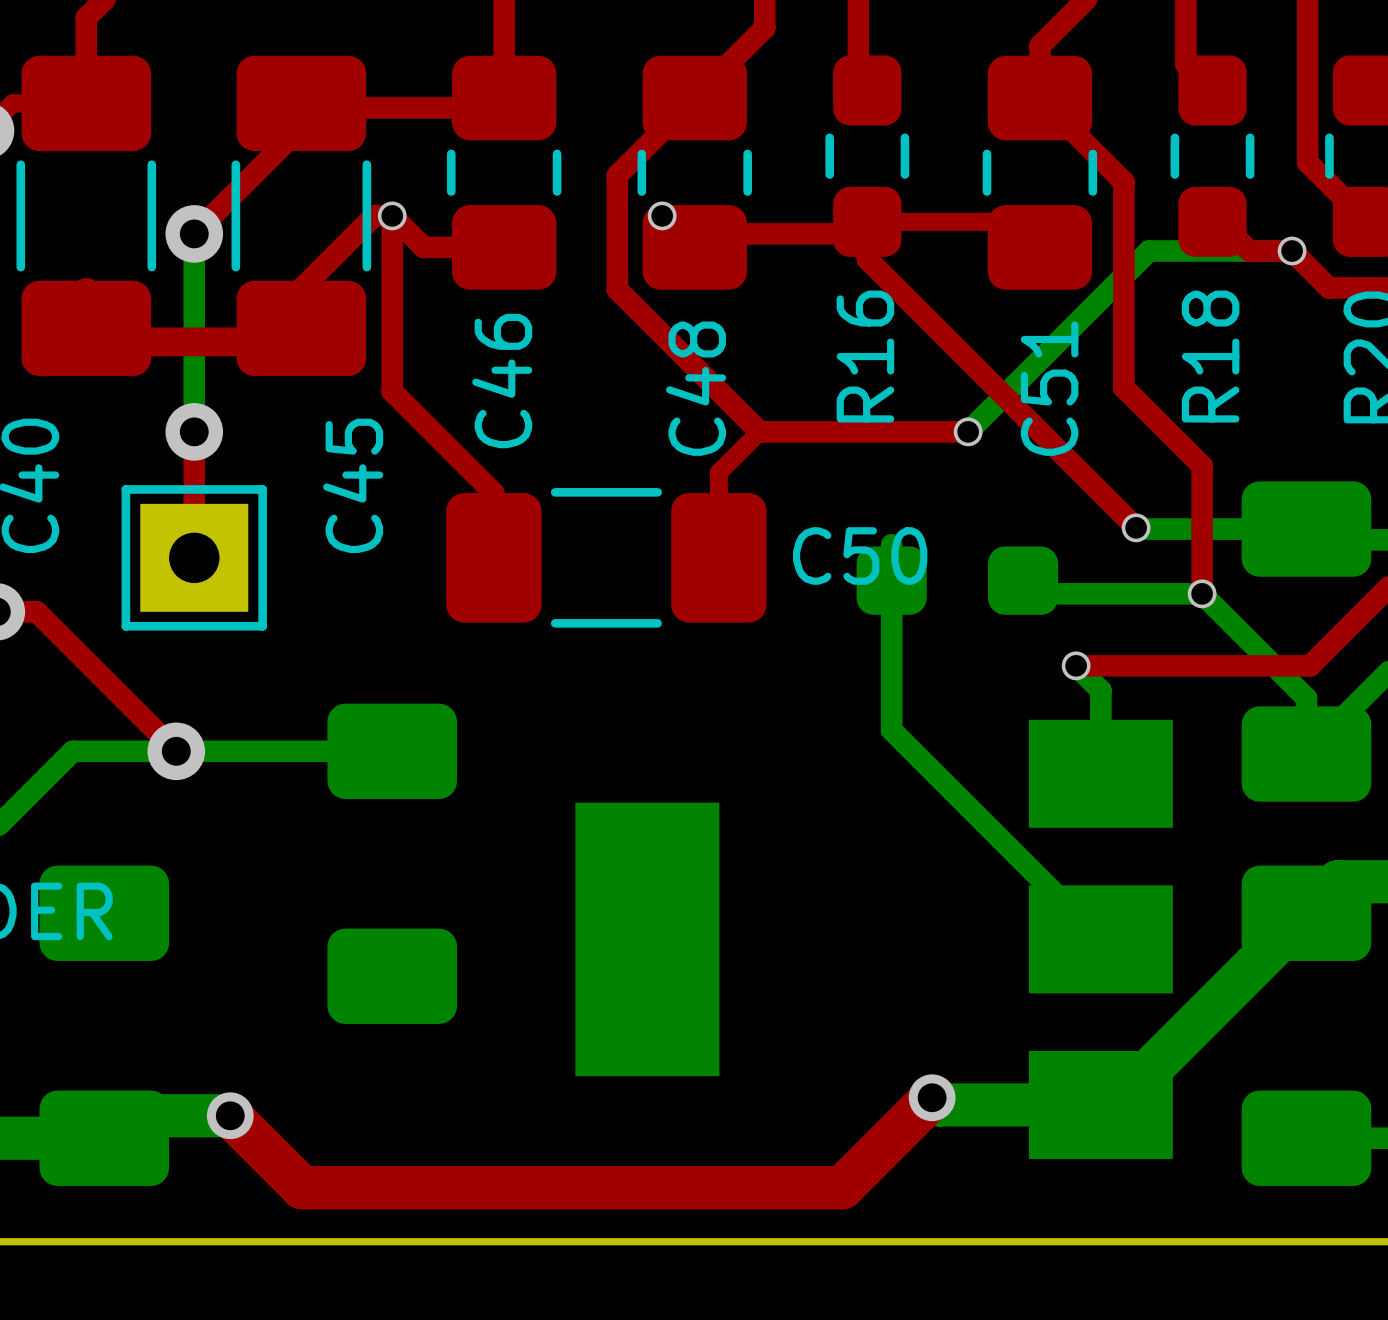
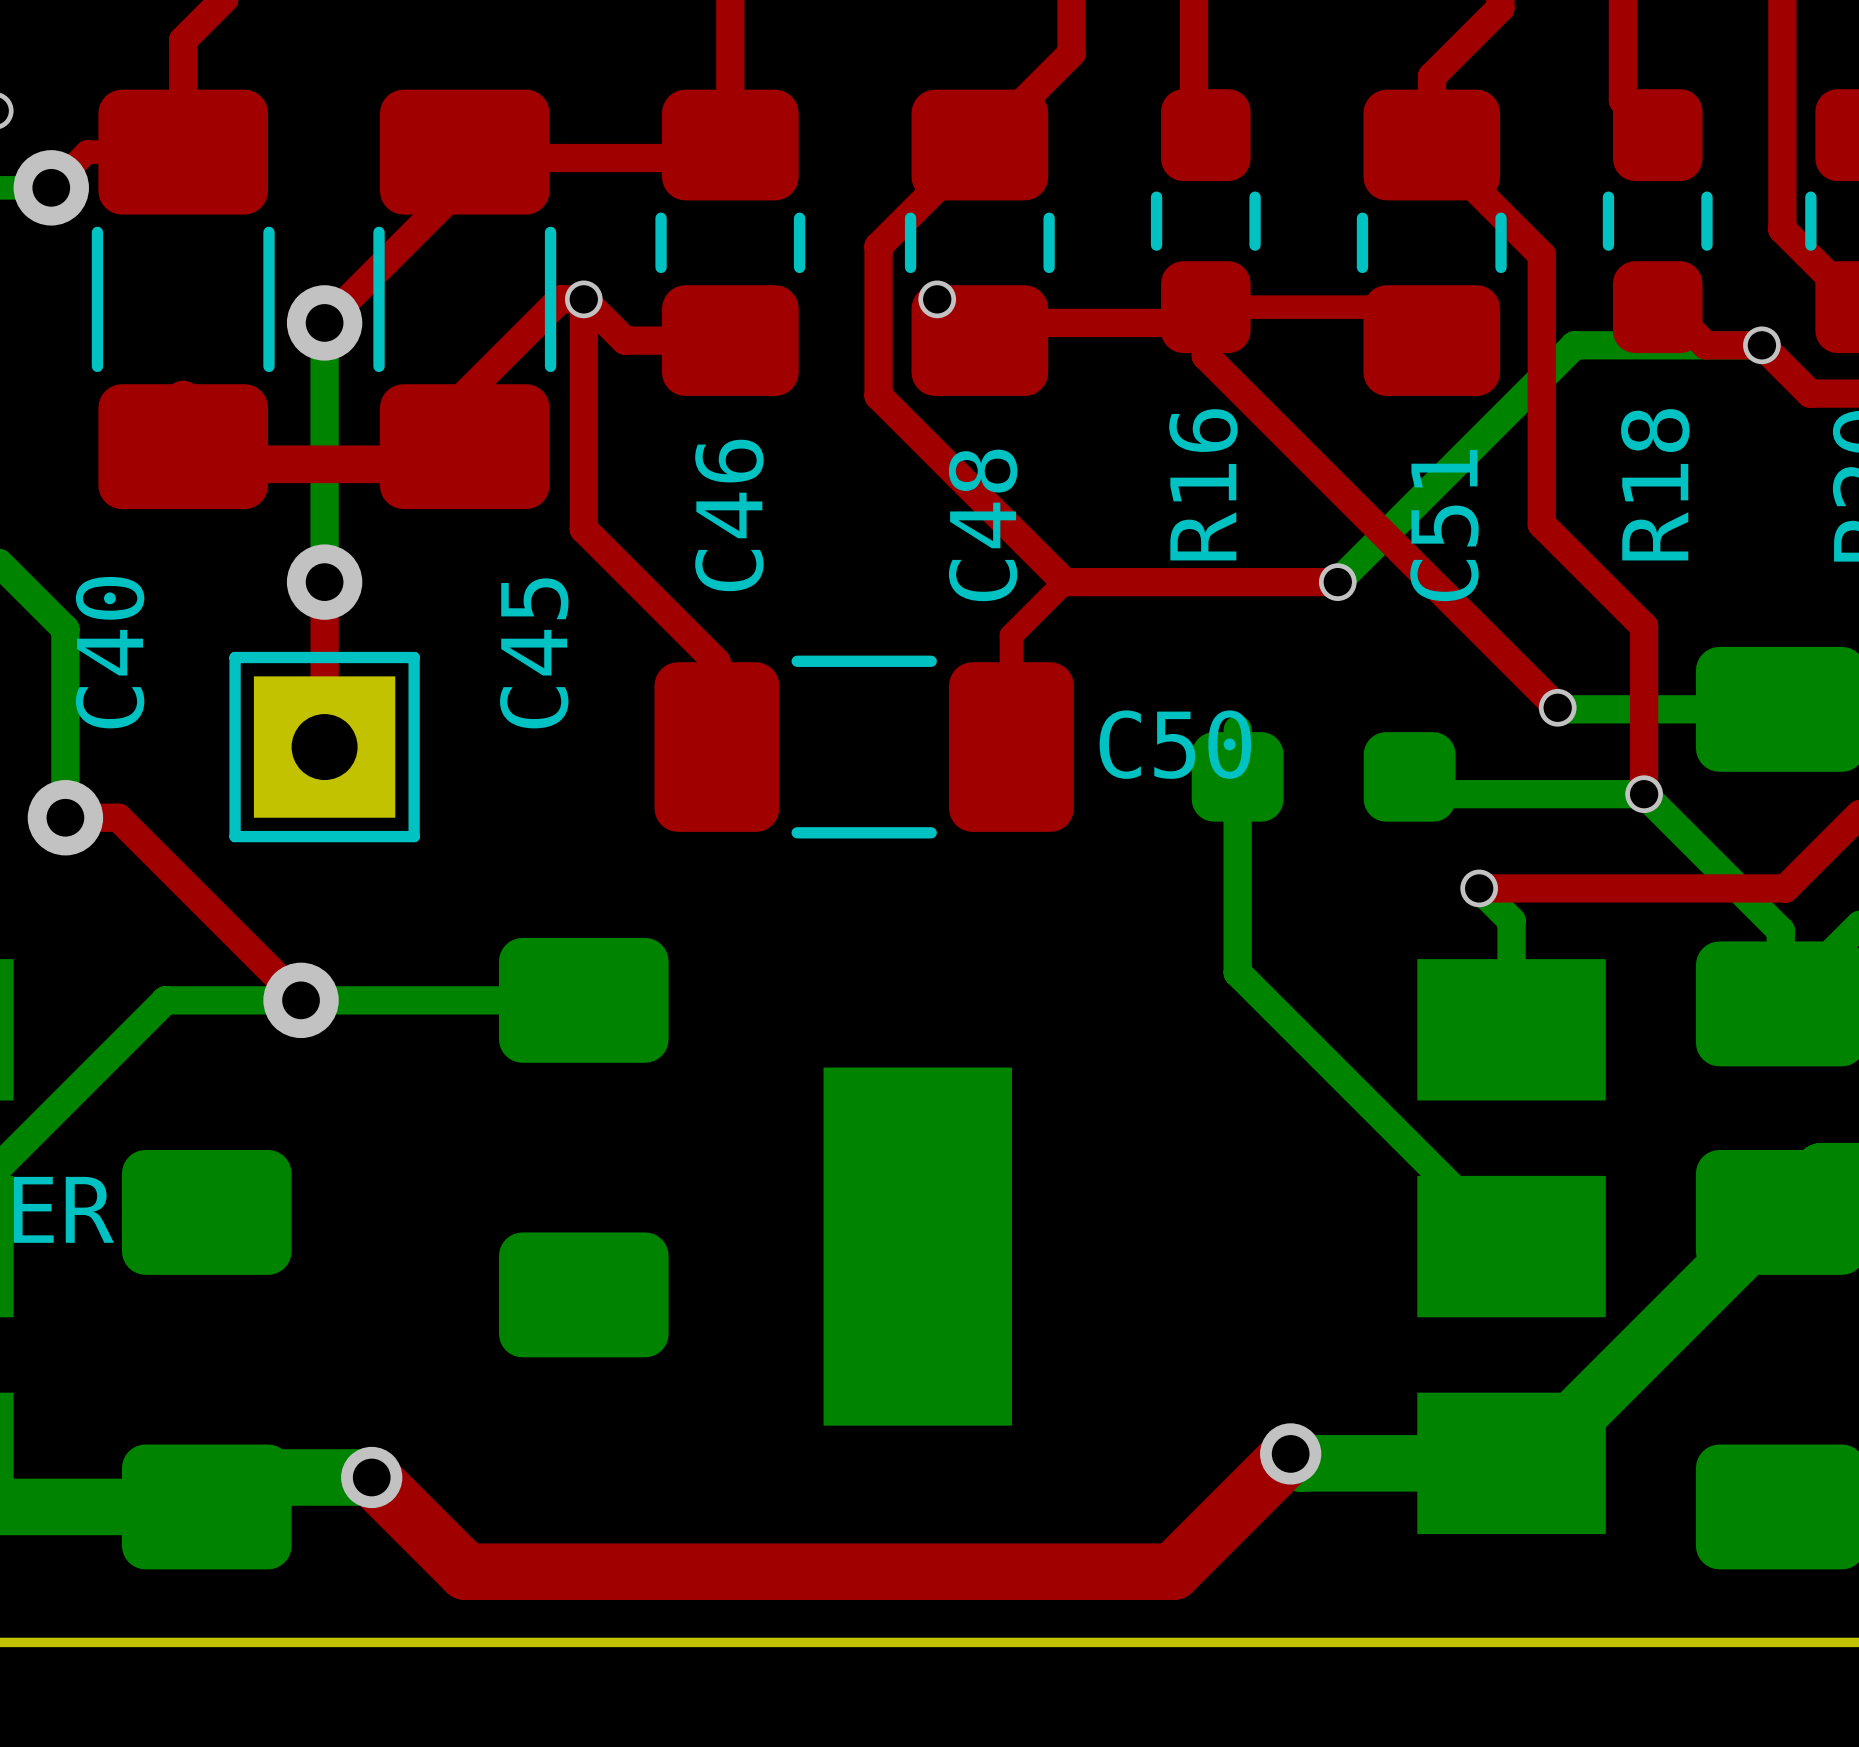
C50 name position: C50 (860, 555) -> C50 (1175, 744)

